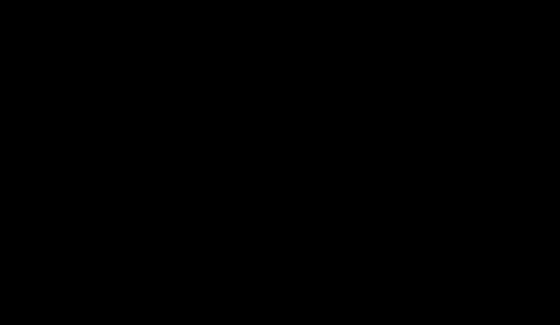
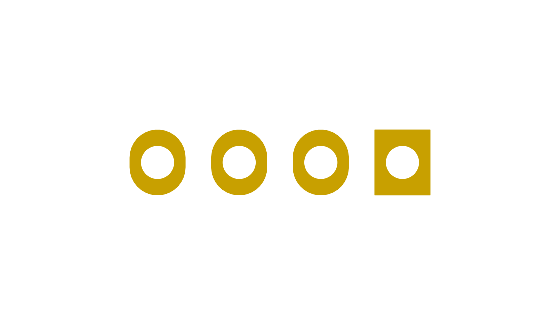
part: none -> (280, 162)

